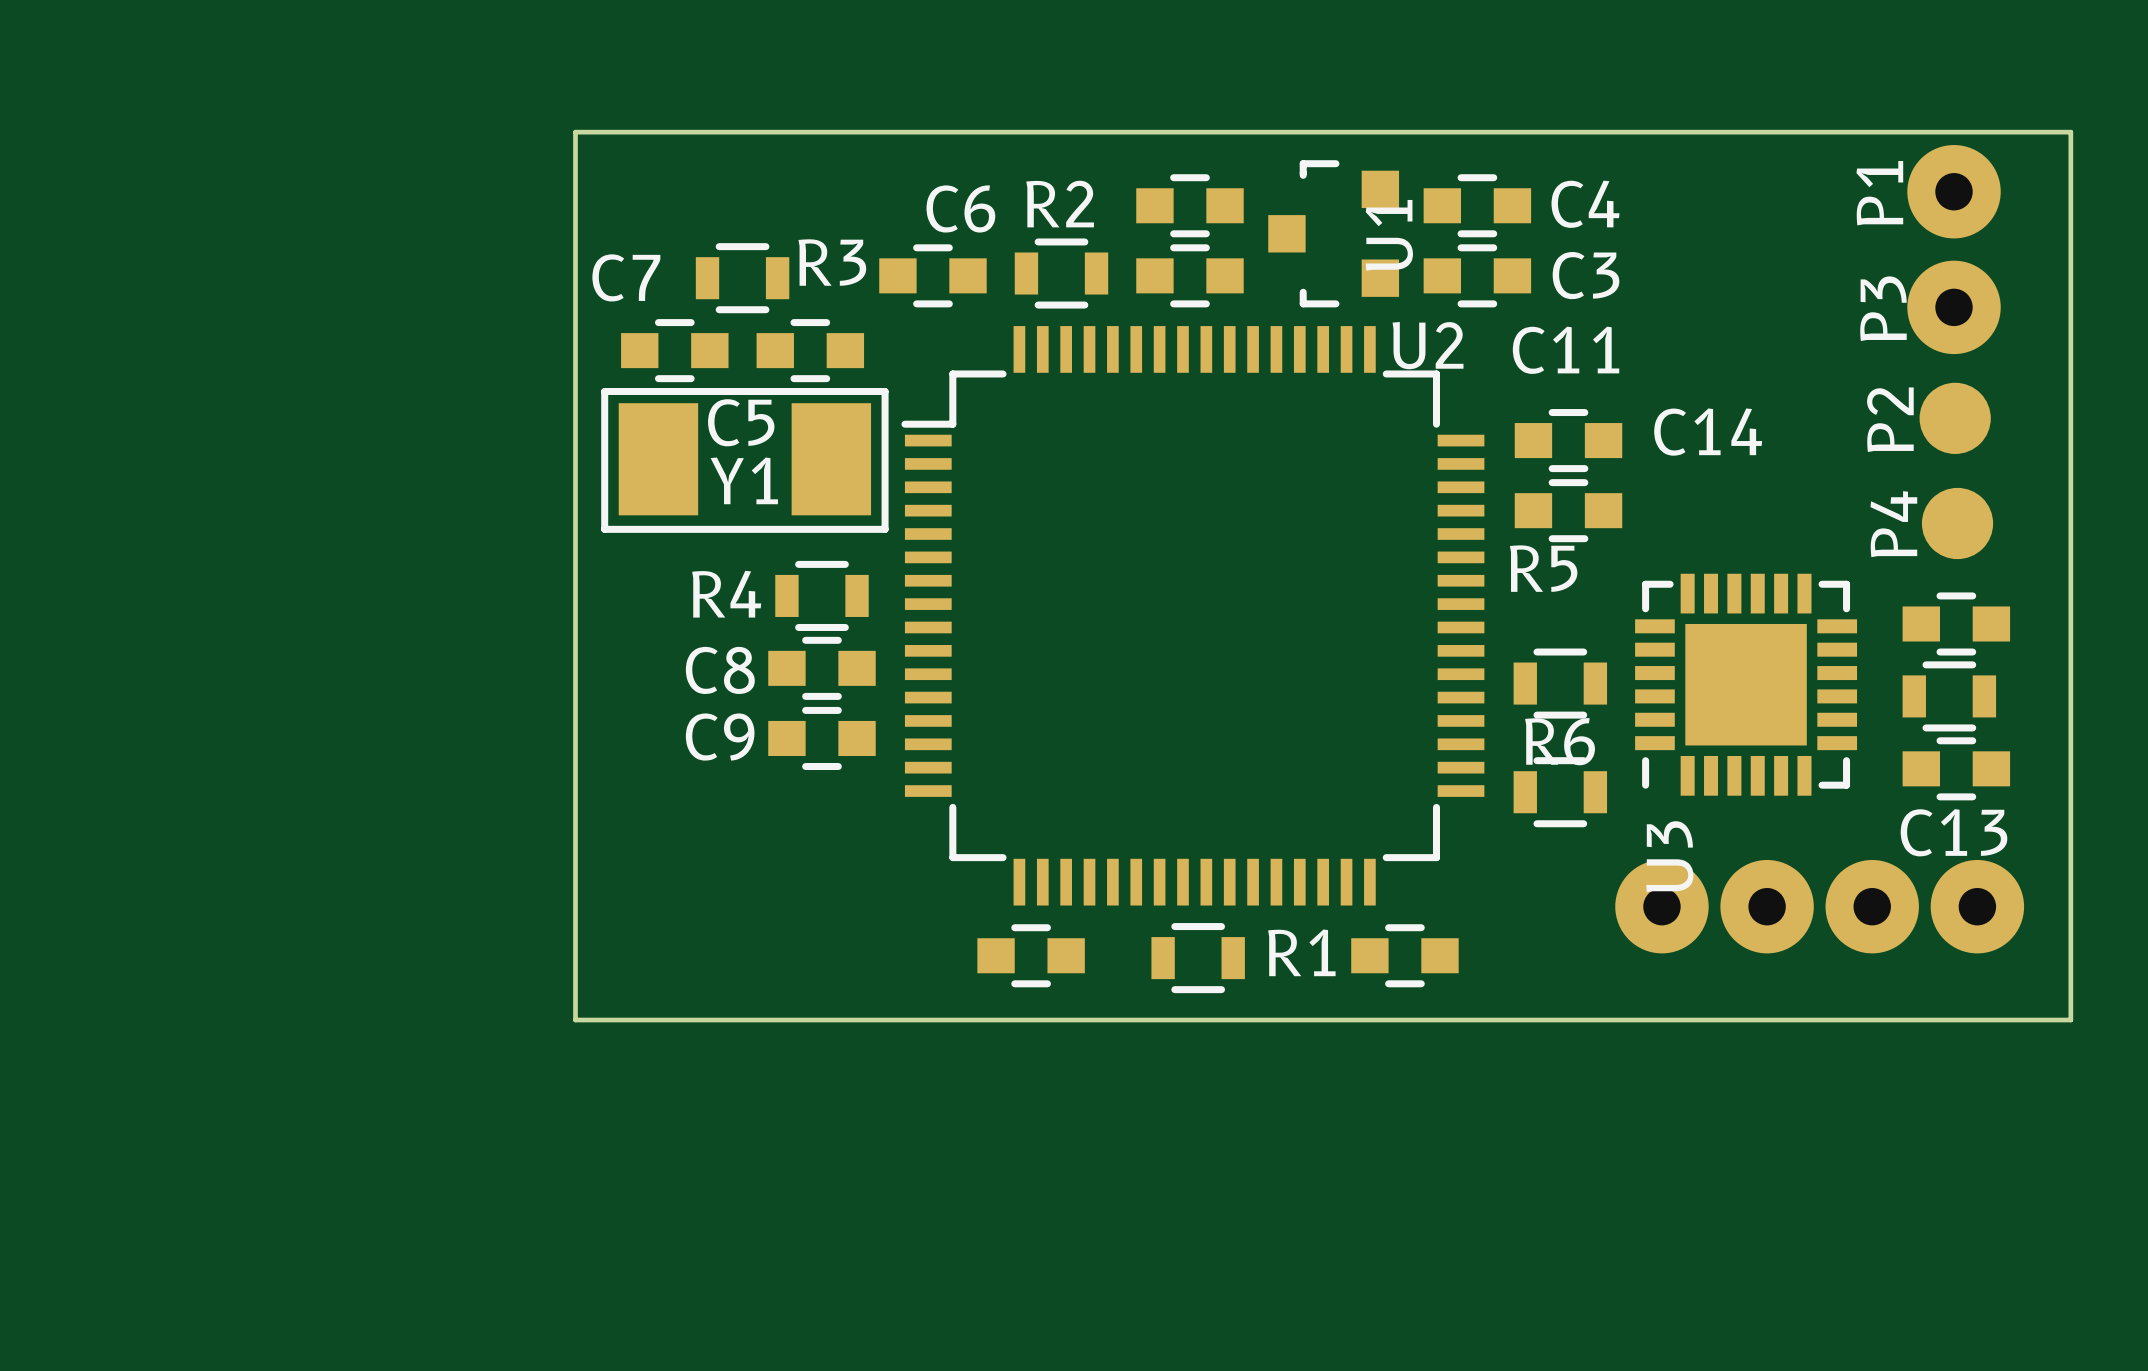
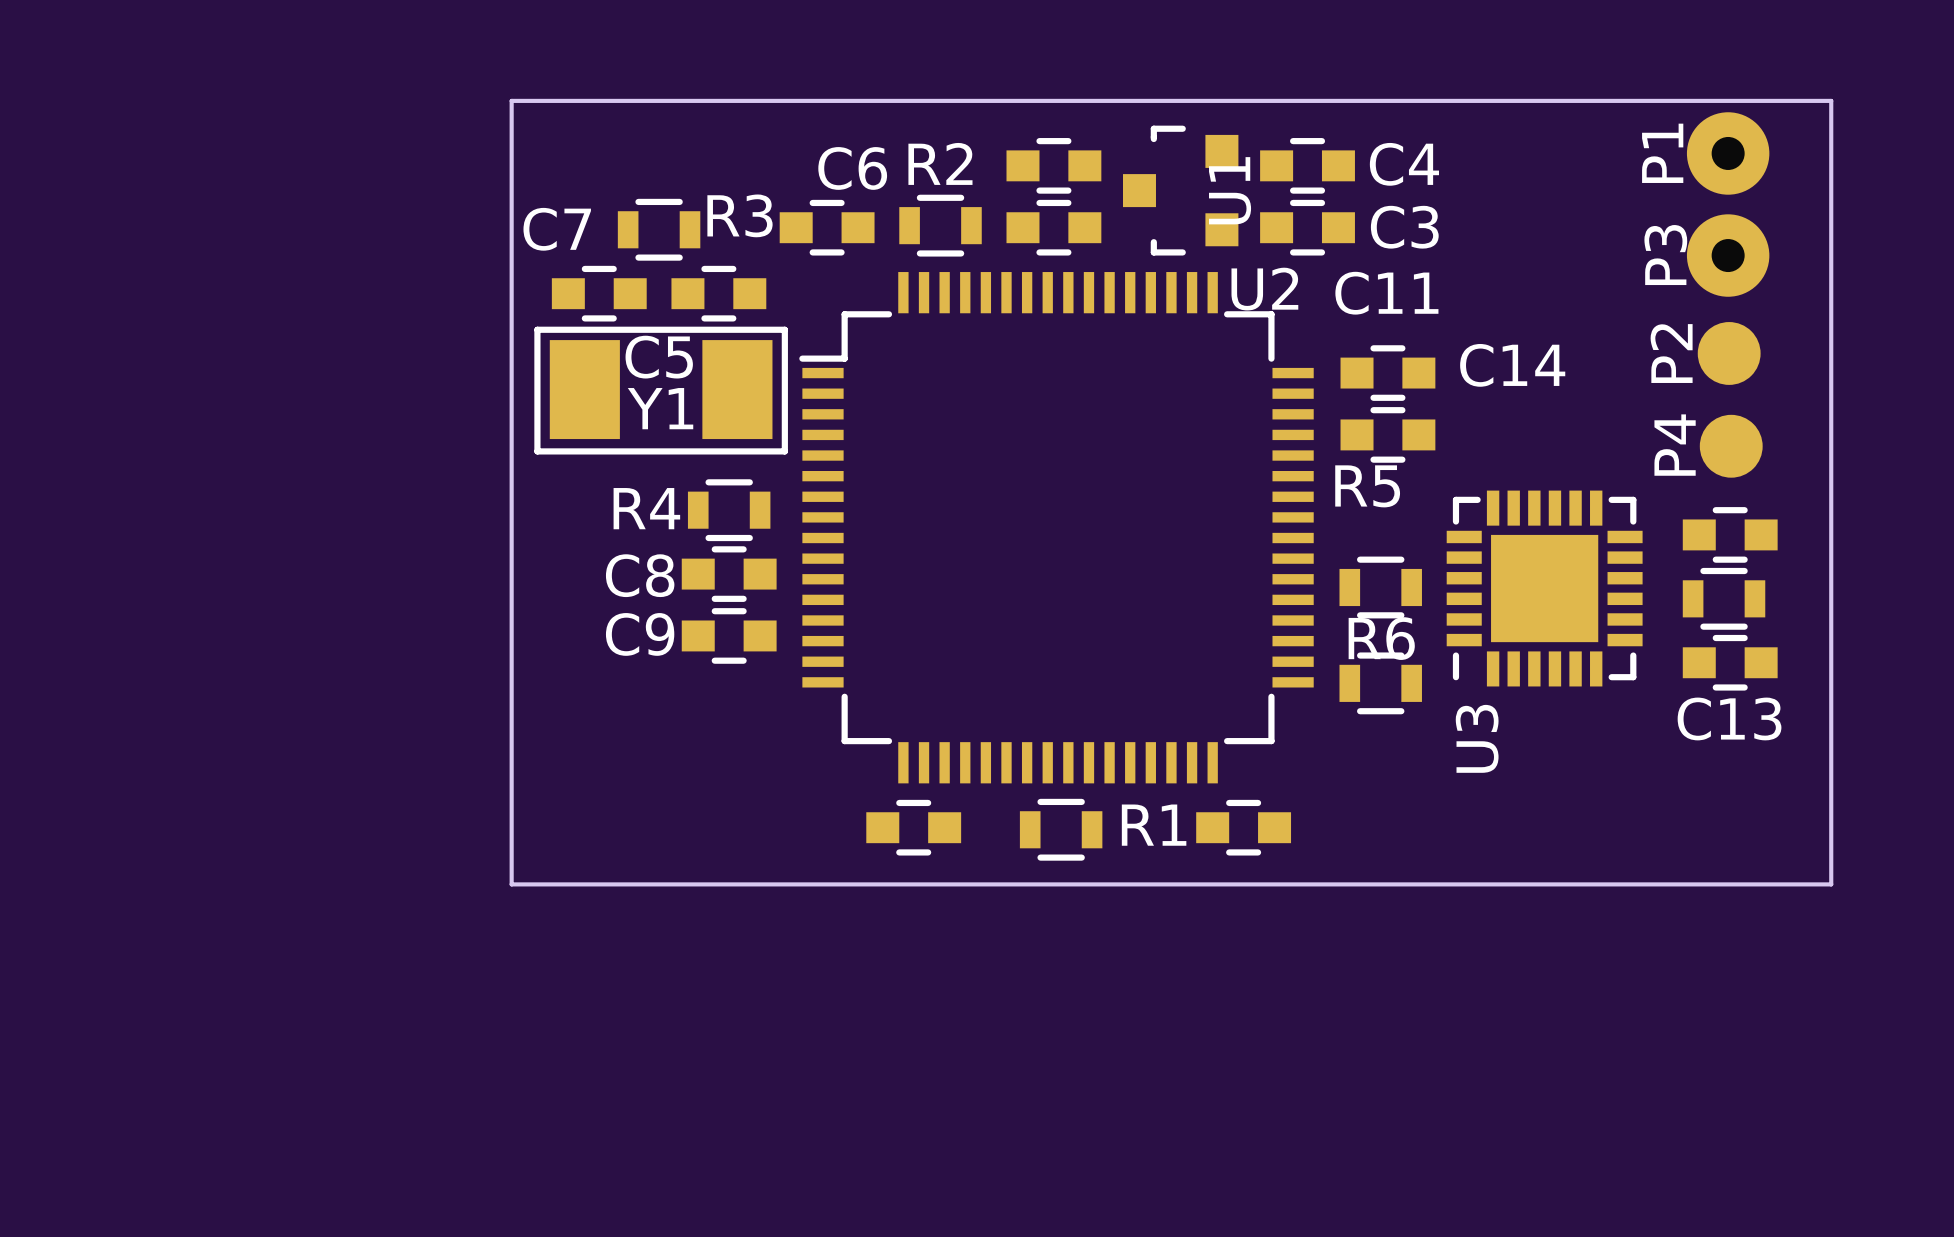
part: (1661, 906) -> none
part: (1767, 906) -> none
part: (1872, 906) -> none
part: (1977, 906) -> none

